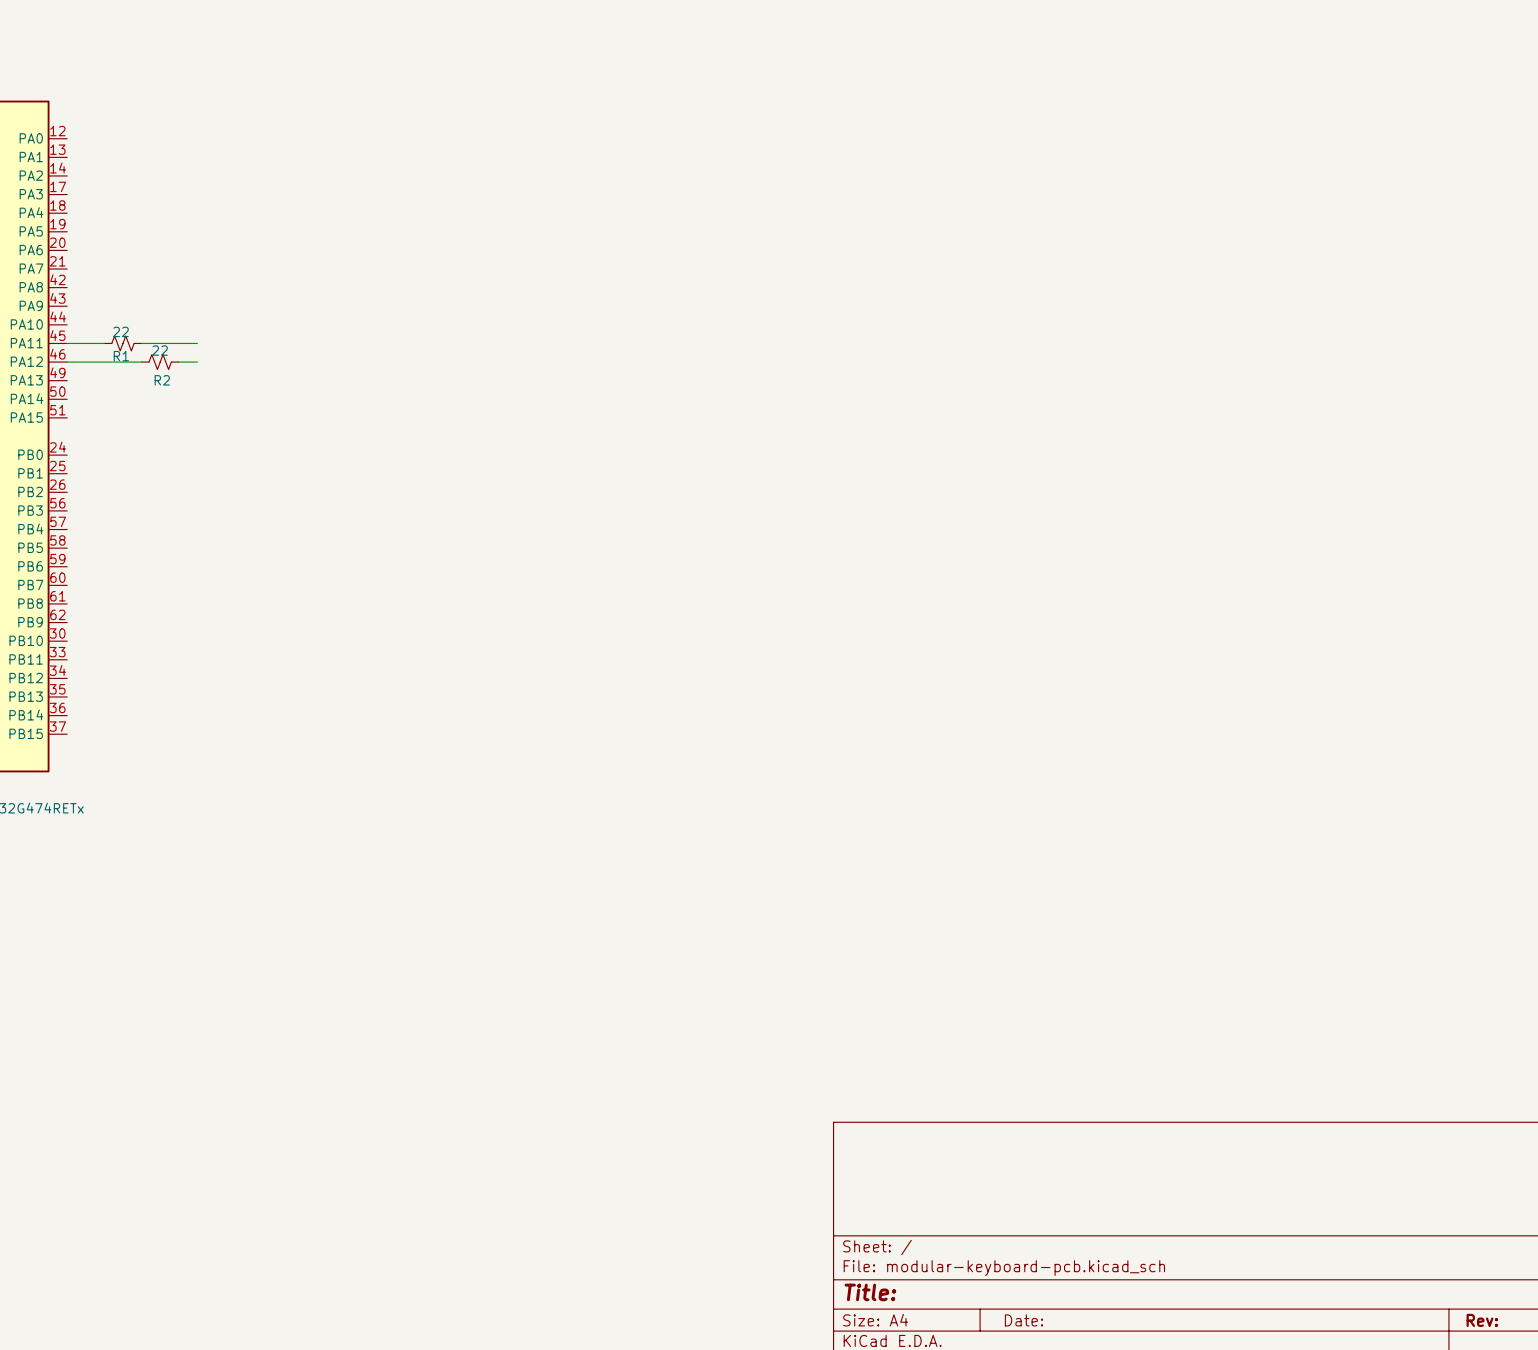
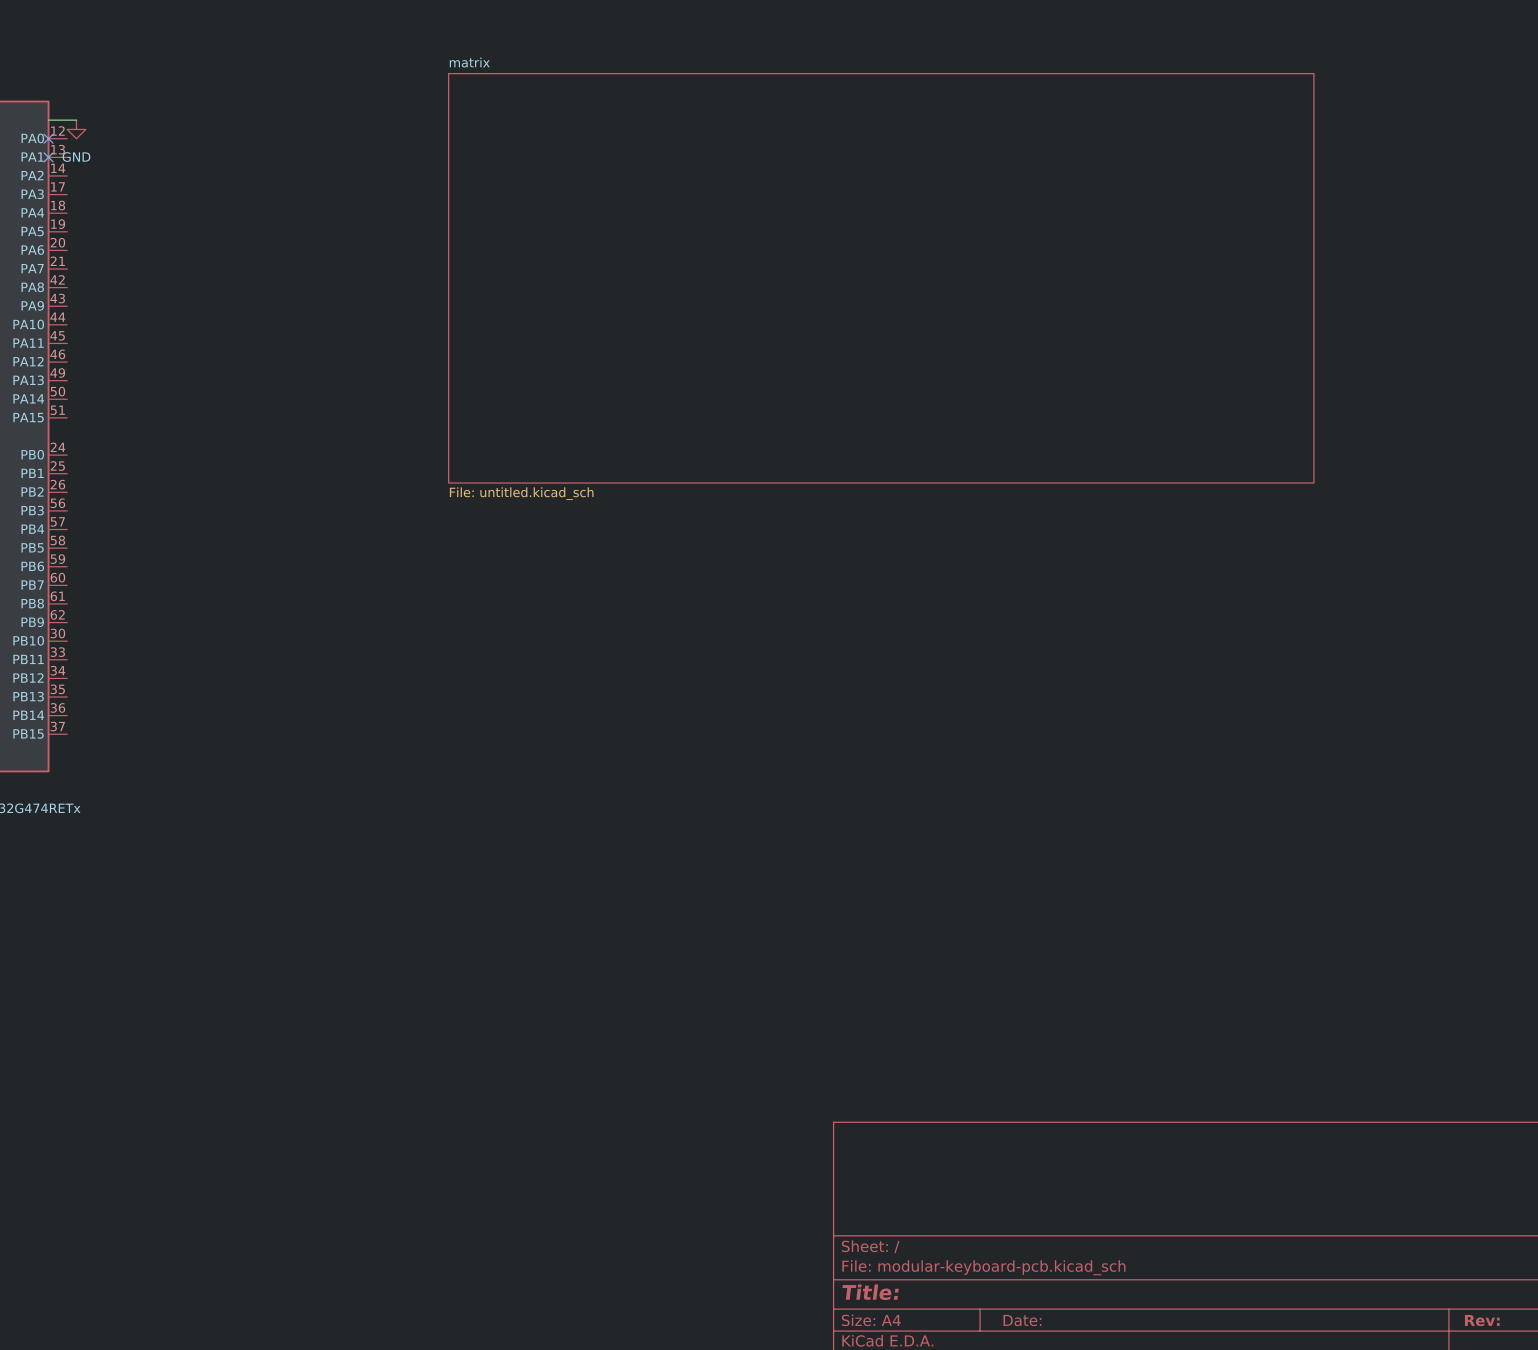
wire: none -> (48, 120) (76, 120)
power symbol: none -> GND (76, 129)
no-connect mark: none -> (48, 138)
no-connect mark: none -> (48, 157)
sheet matrix: none -> File: untitled.kicad_sch (881, 278)
wire: (67, 343) (104, 343) -> none
R1: 22 (123, 343) -> none
wire: (141, 343) (197, 343) -> none
wire: (67, 362) (141, 362) -> none
R2: 22 (160, 362) -> none
wire: (178, 362) (197, 362) -> none

